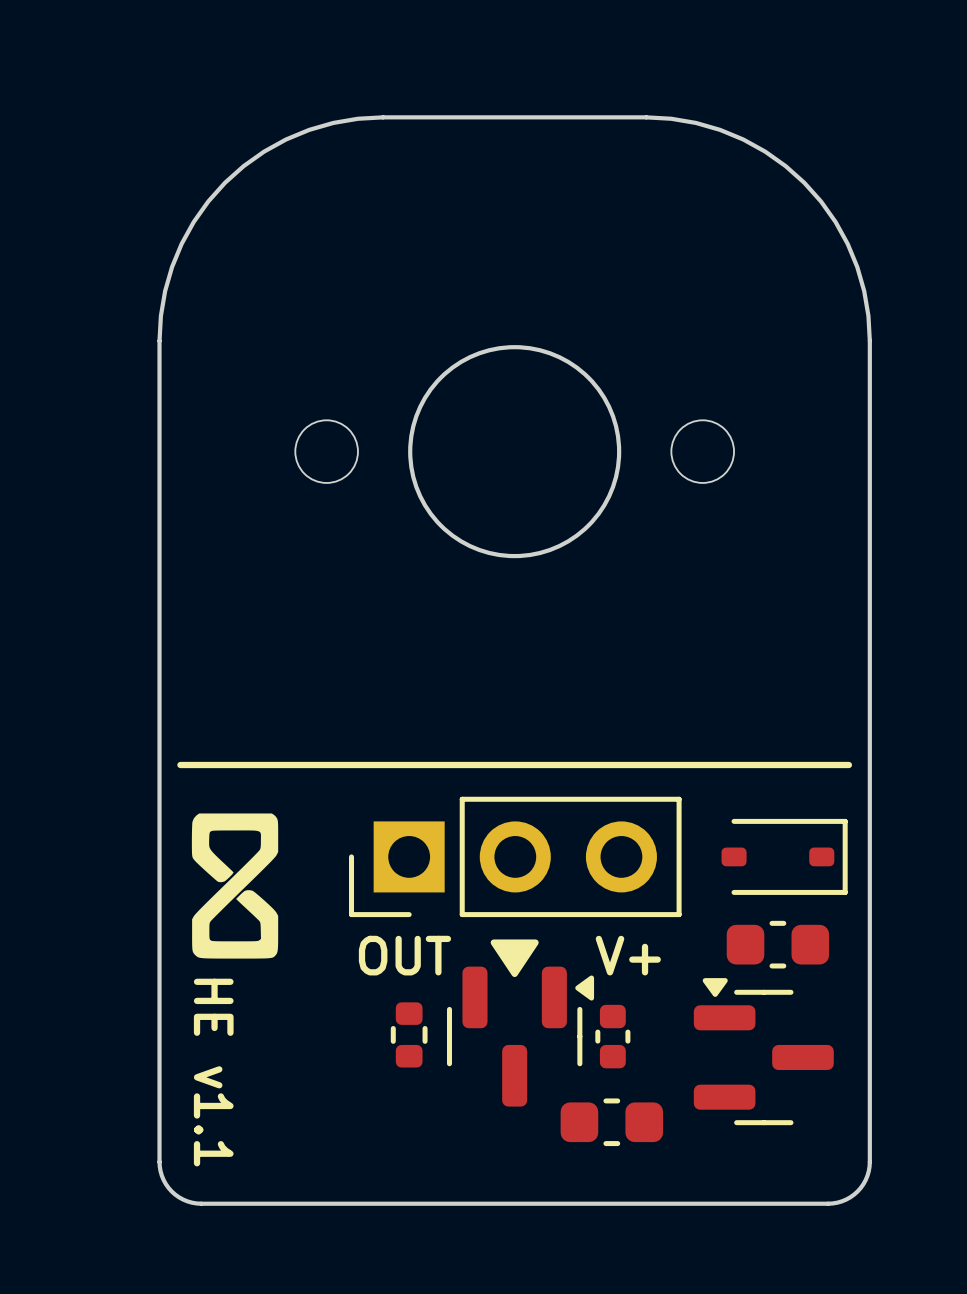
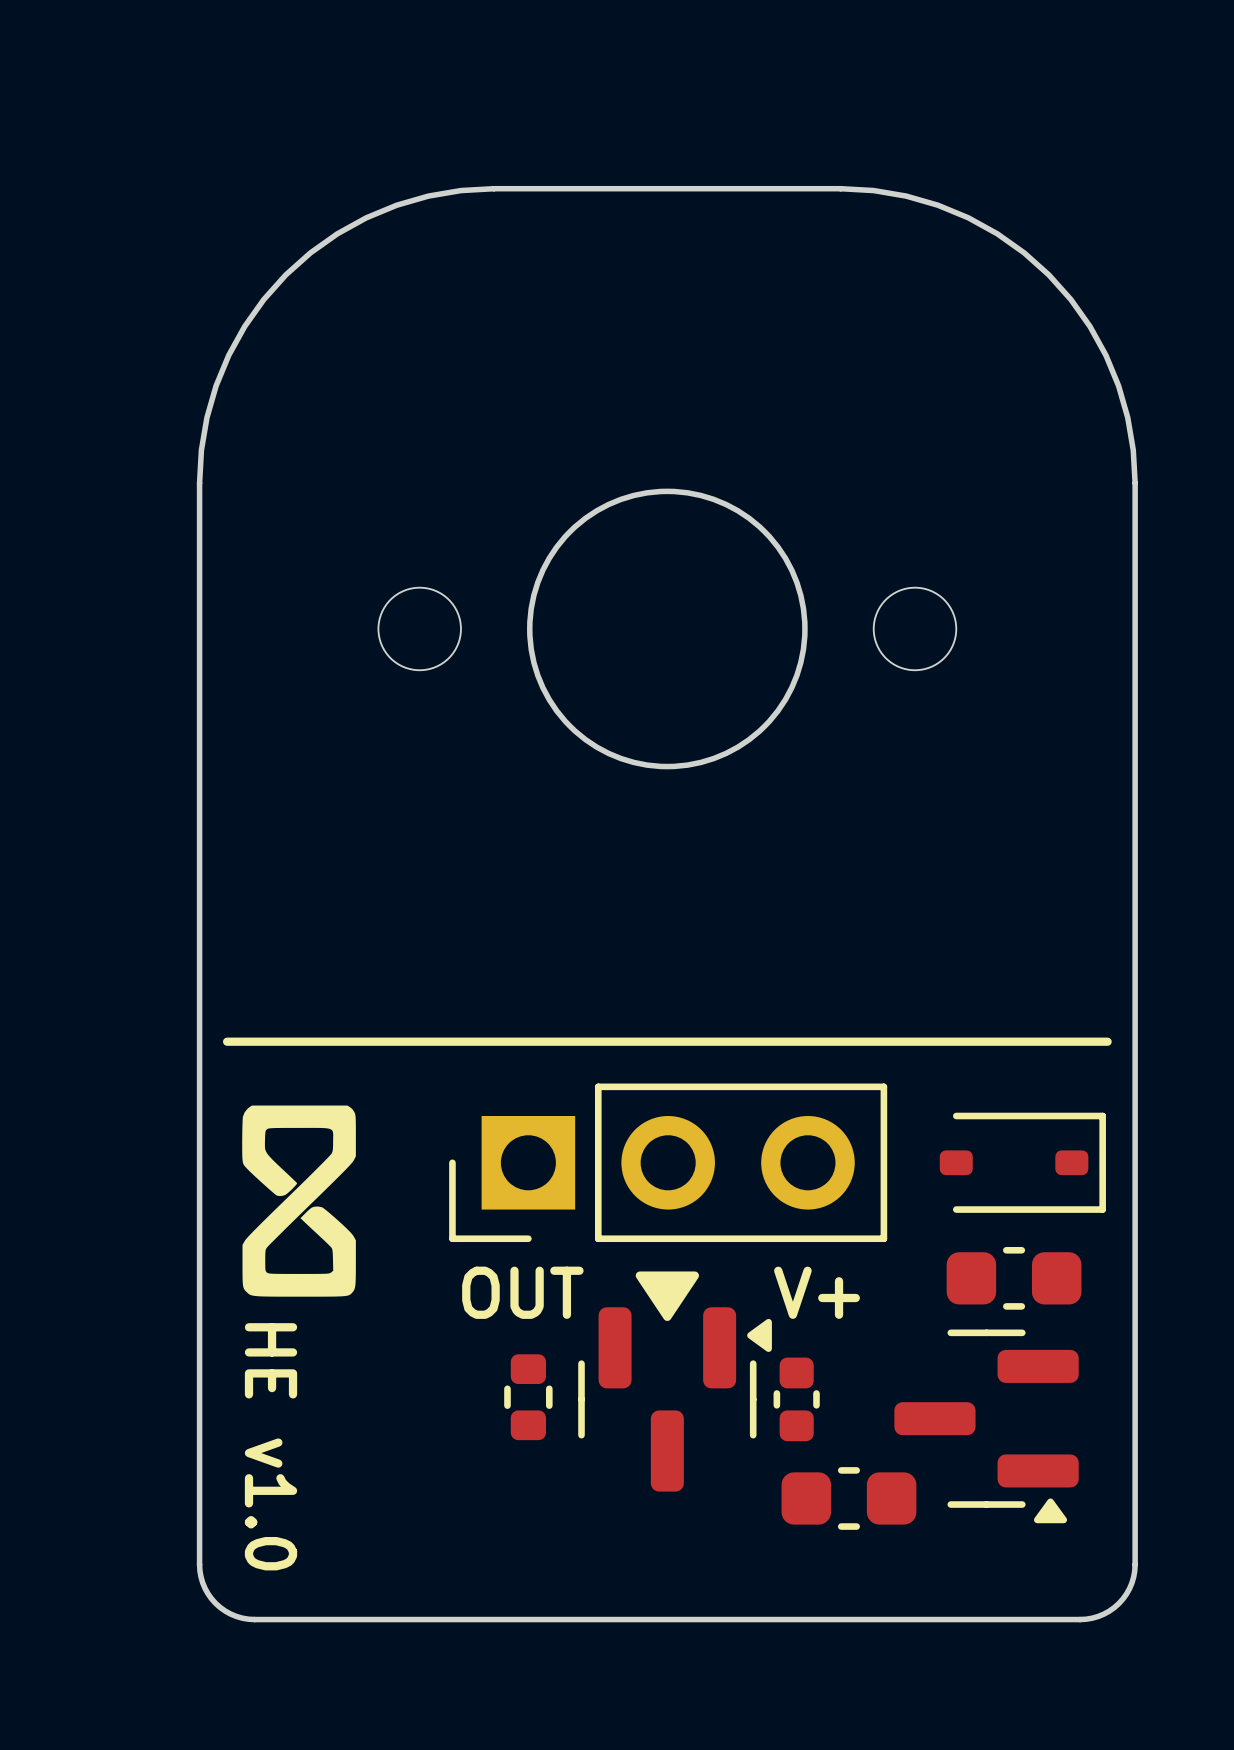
part rotation: 0° (763, 1051) -> 180° (986, 1426)
text: HE v1.1 (213, 1072) -> HE v1.0 (271, 1446)
part position: (611, 1122) -> (848, 1498)

